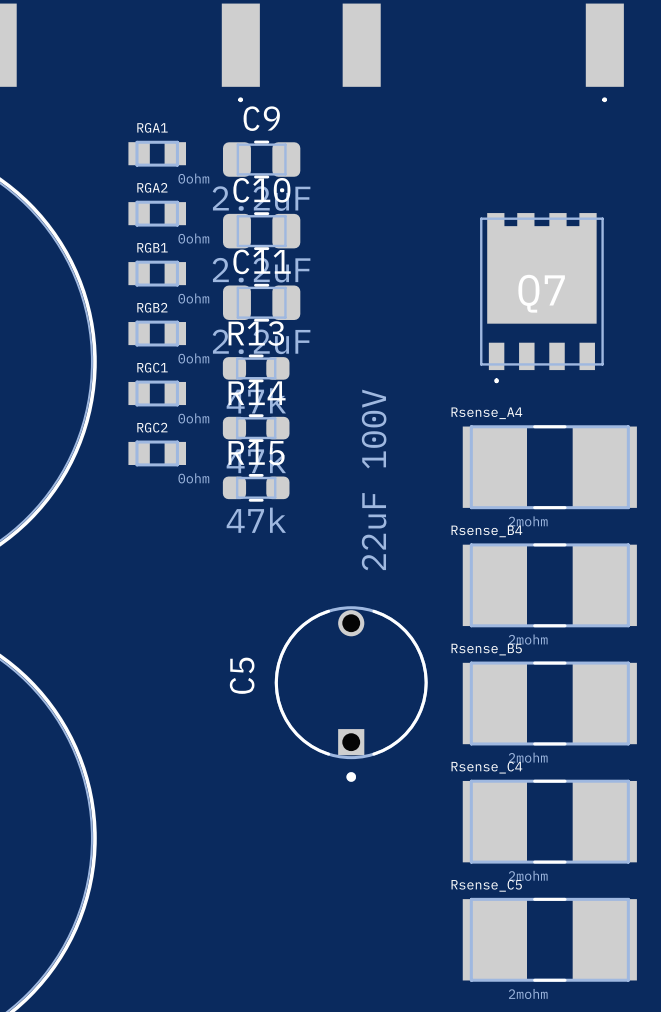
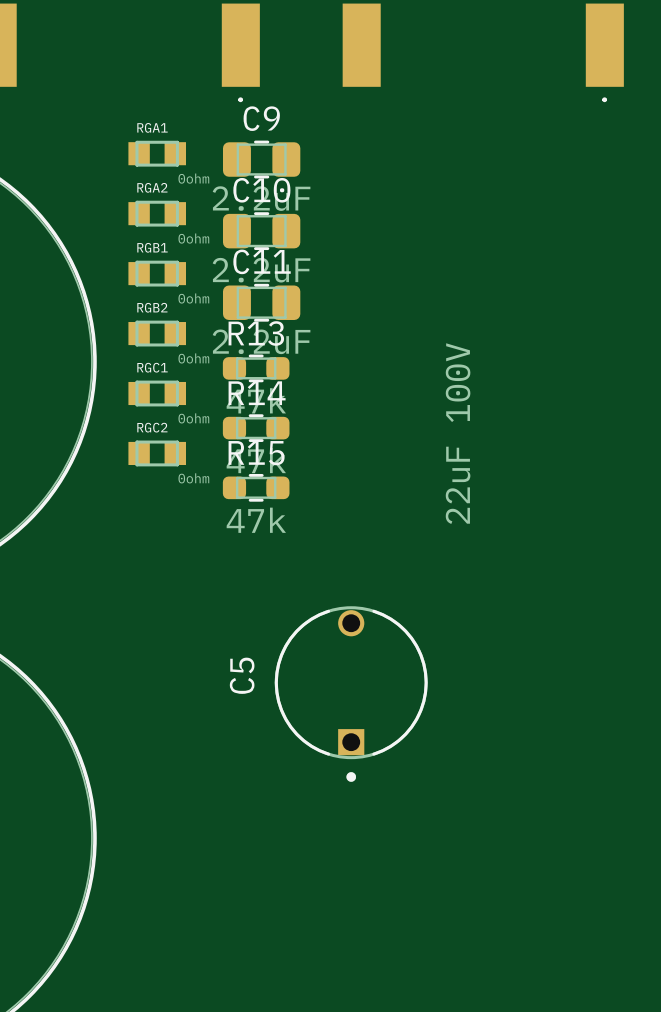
part: (541, 298) -> none
Rsense_A4: 2mohm (549, 467) -> none
C5 value position: 22uF 100V (374, 479) -> 22uF 100V (458, 433)
Rsense_B4: 2mohm (549, 585) -> none
Rsense_B5: 2mohm (549, 703) -> none
Rsense_C4: 2mohm (549, 821) -> none
Rsense_C5: 2mohm (549, 939) -> none

